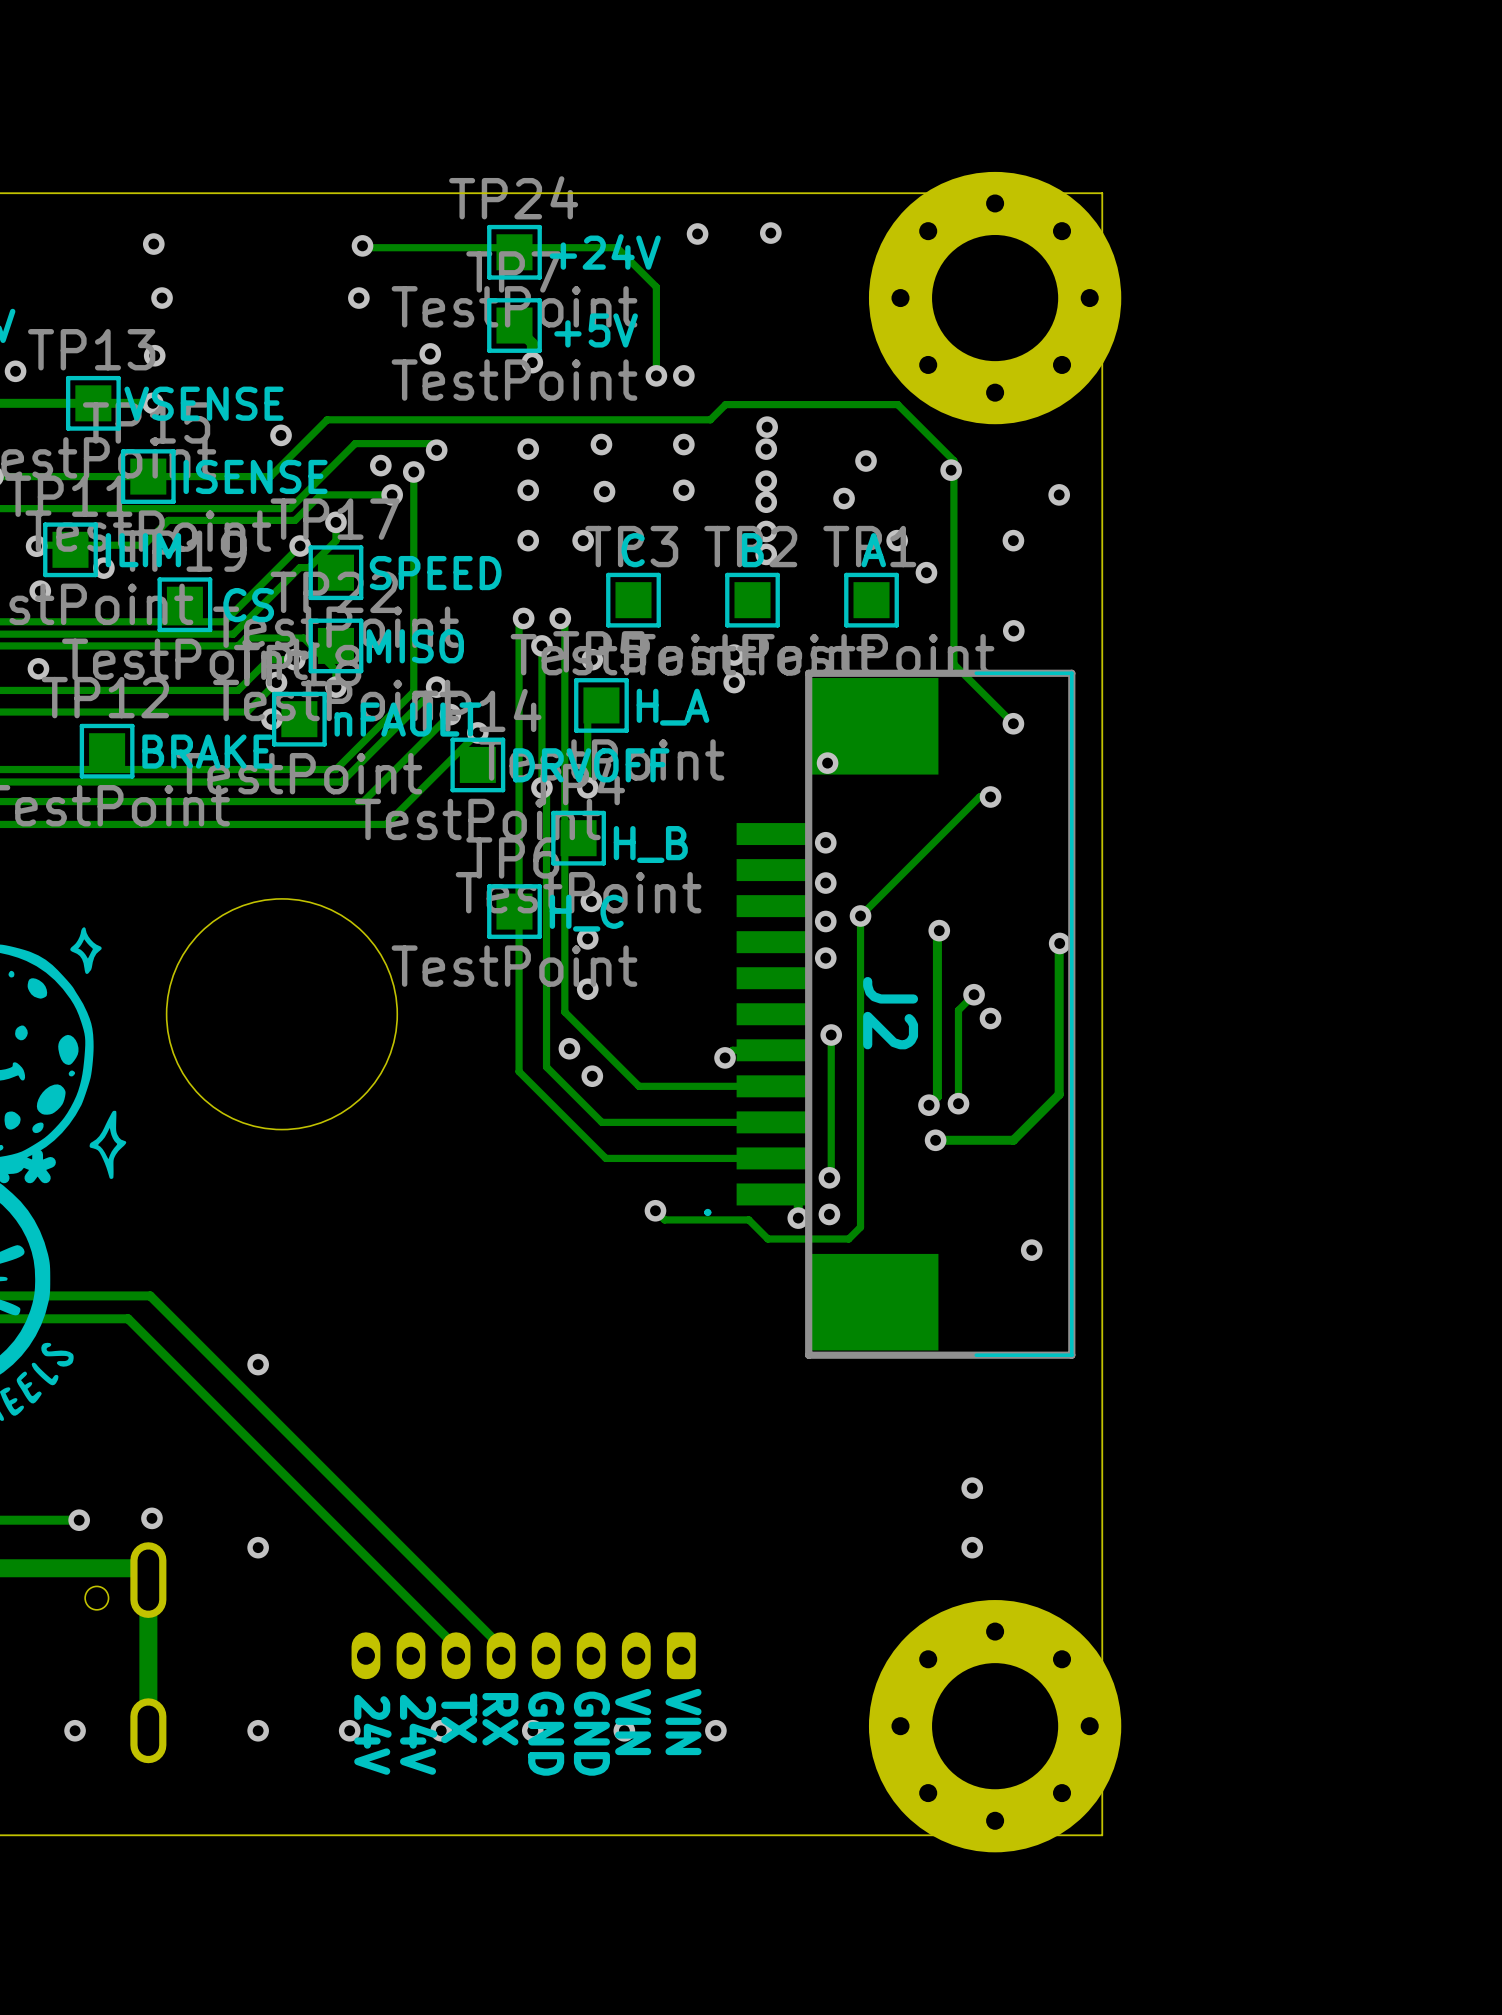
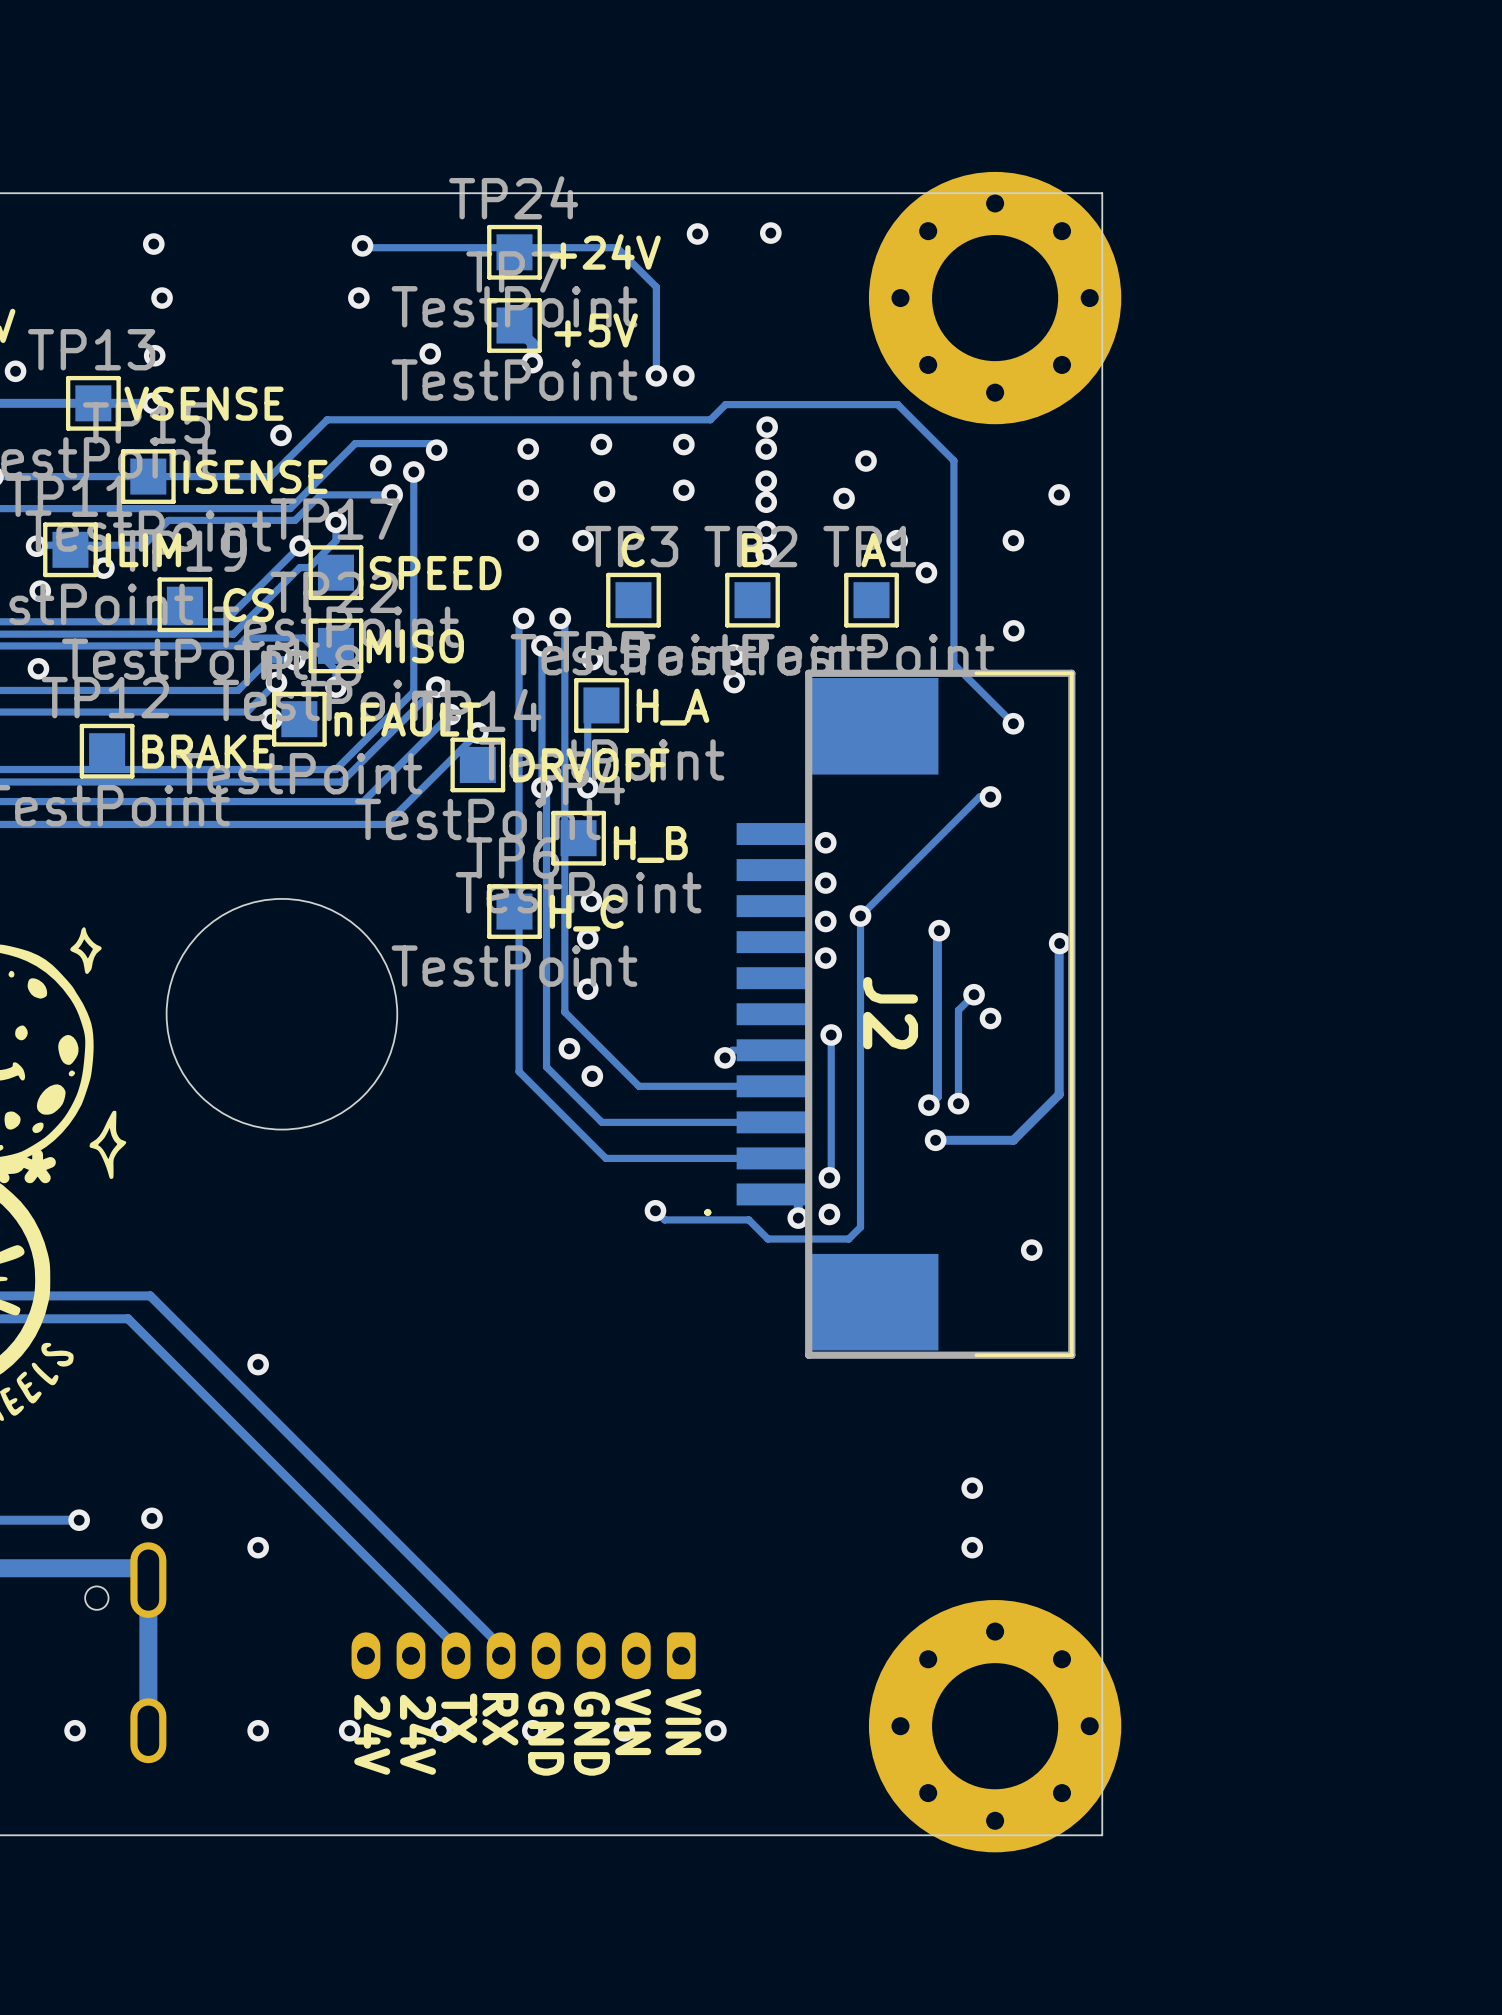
via: (951, 470) -> none
via: (827, 763) -> none

